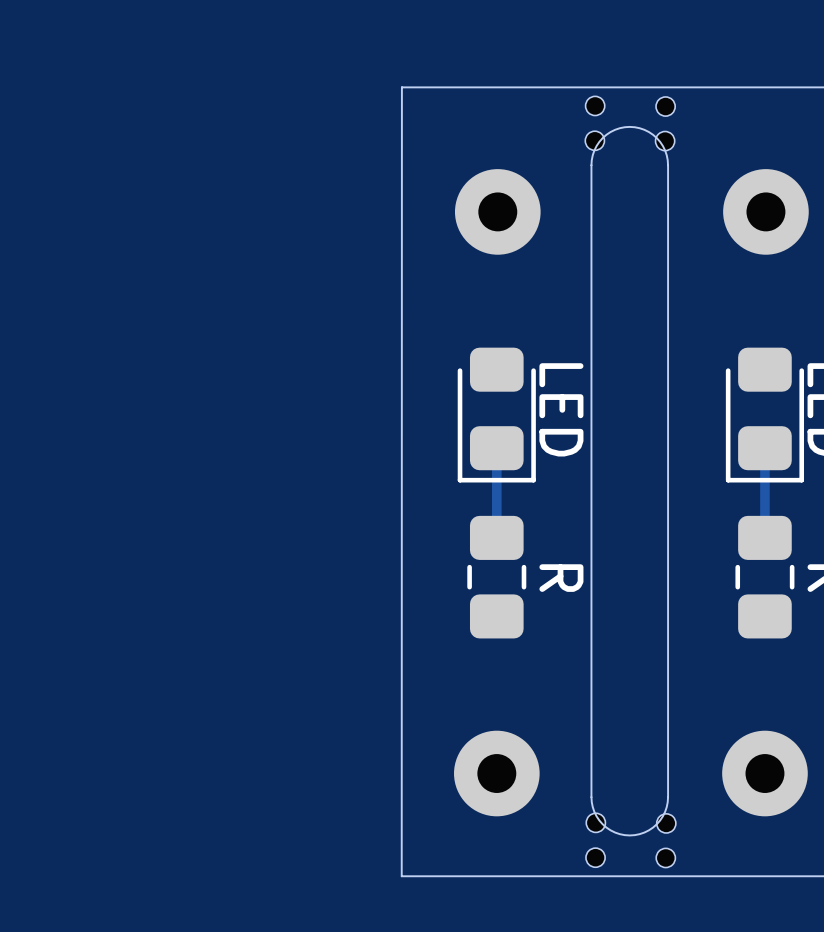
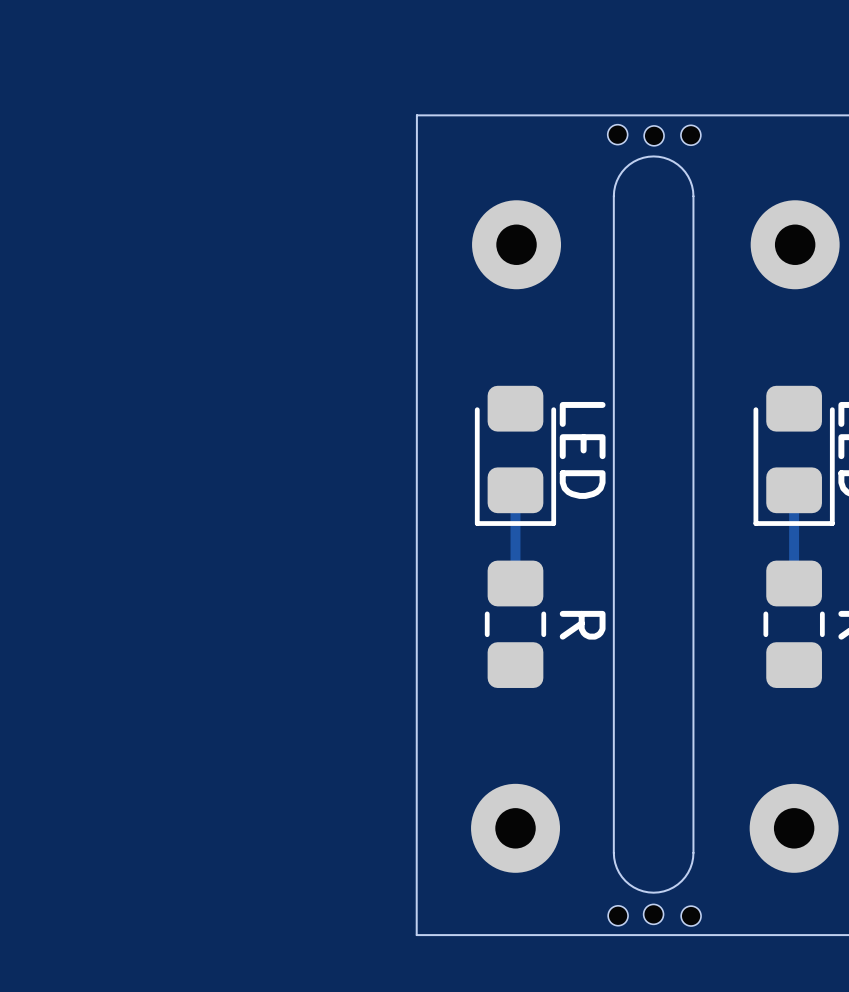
part: none -> (654, 135)
part: (594, 140) -> none
part: (665, 141) -> none
part: (595, 822) -> none
part: (666, 823) -> none
part: none -> (653, 914)

